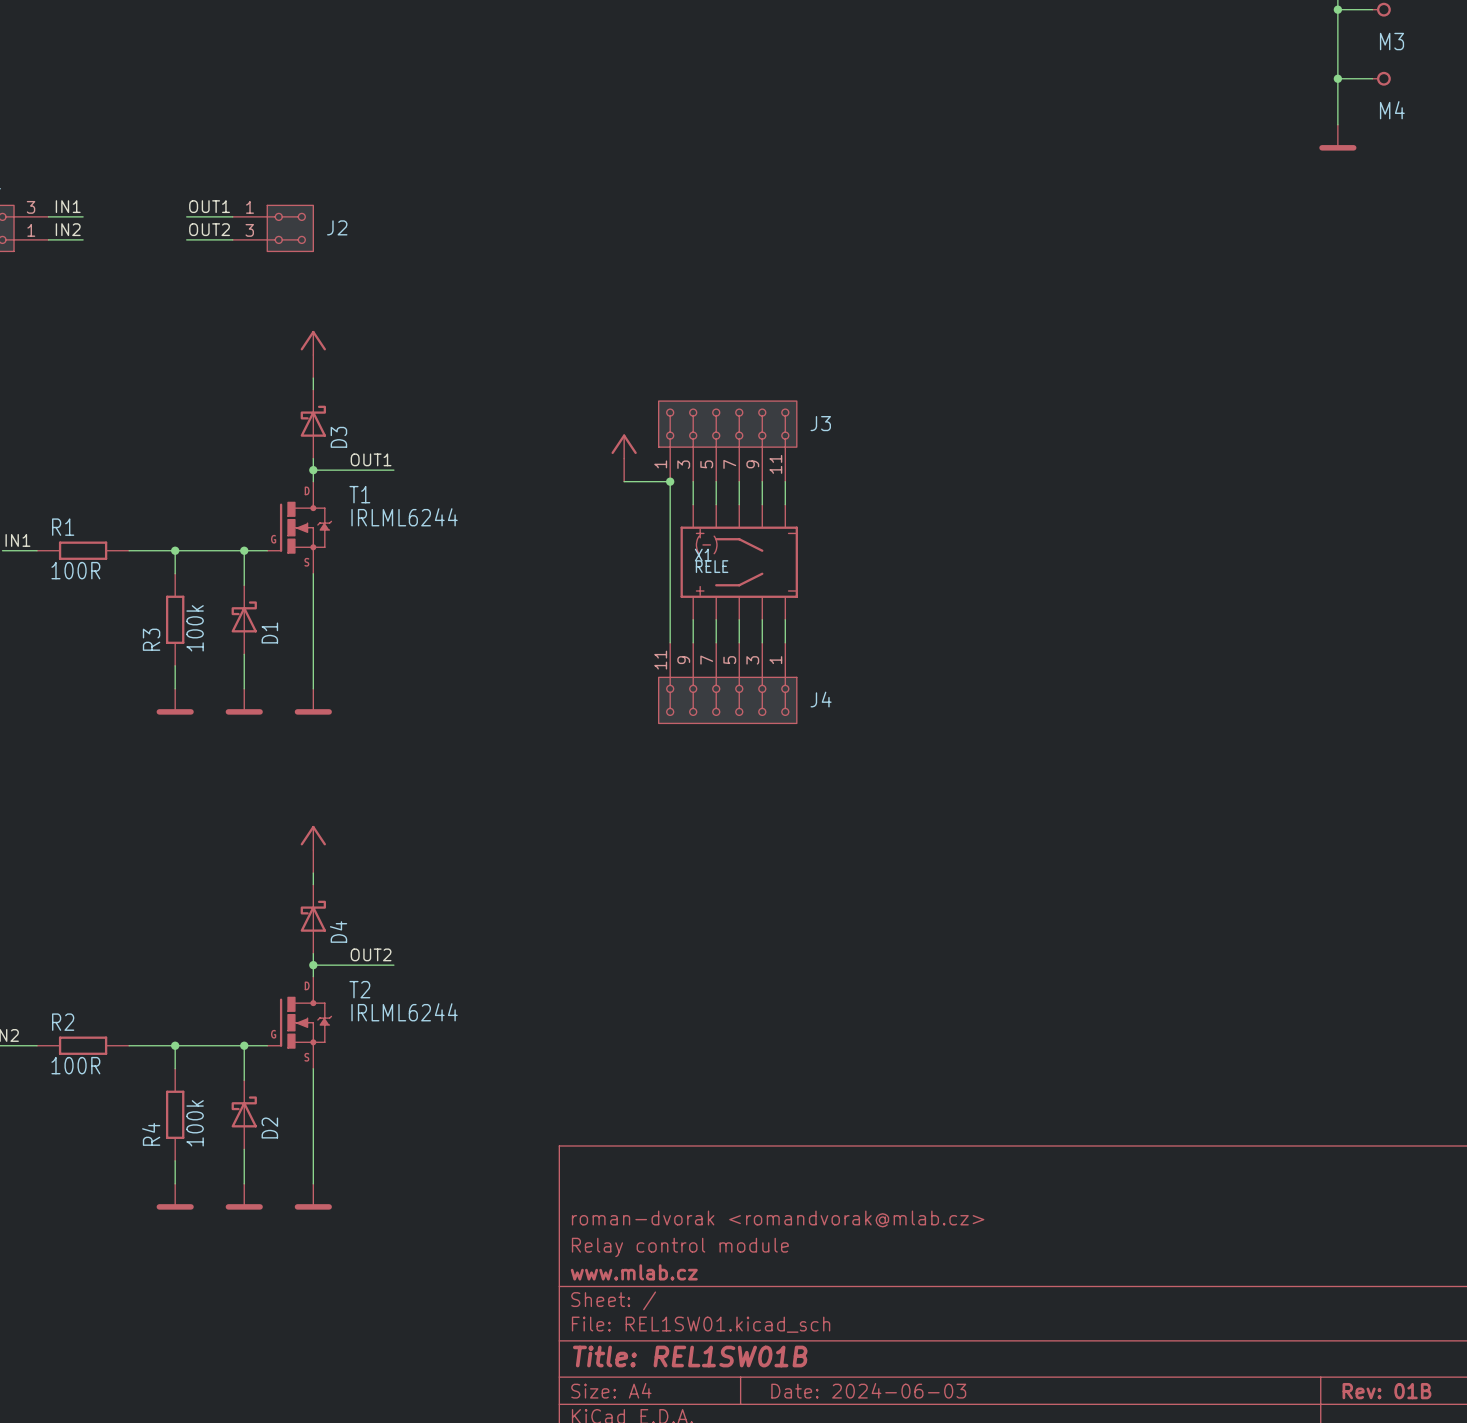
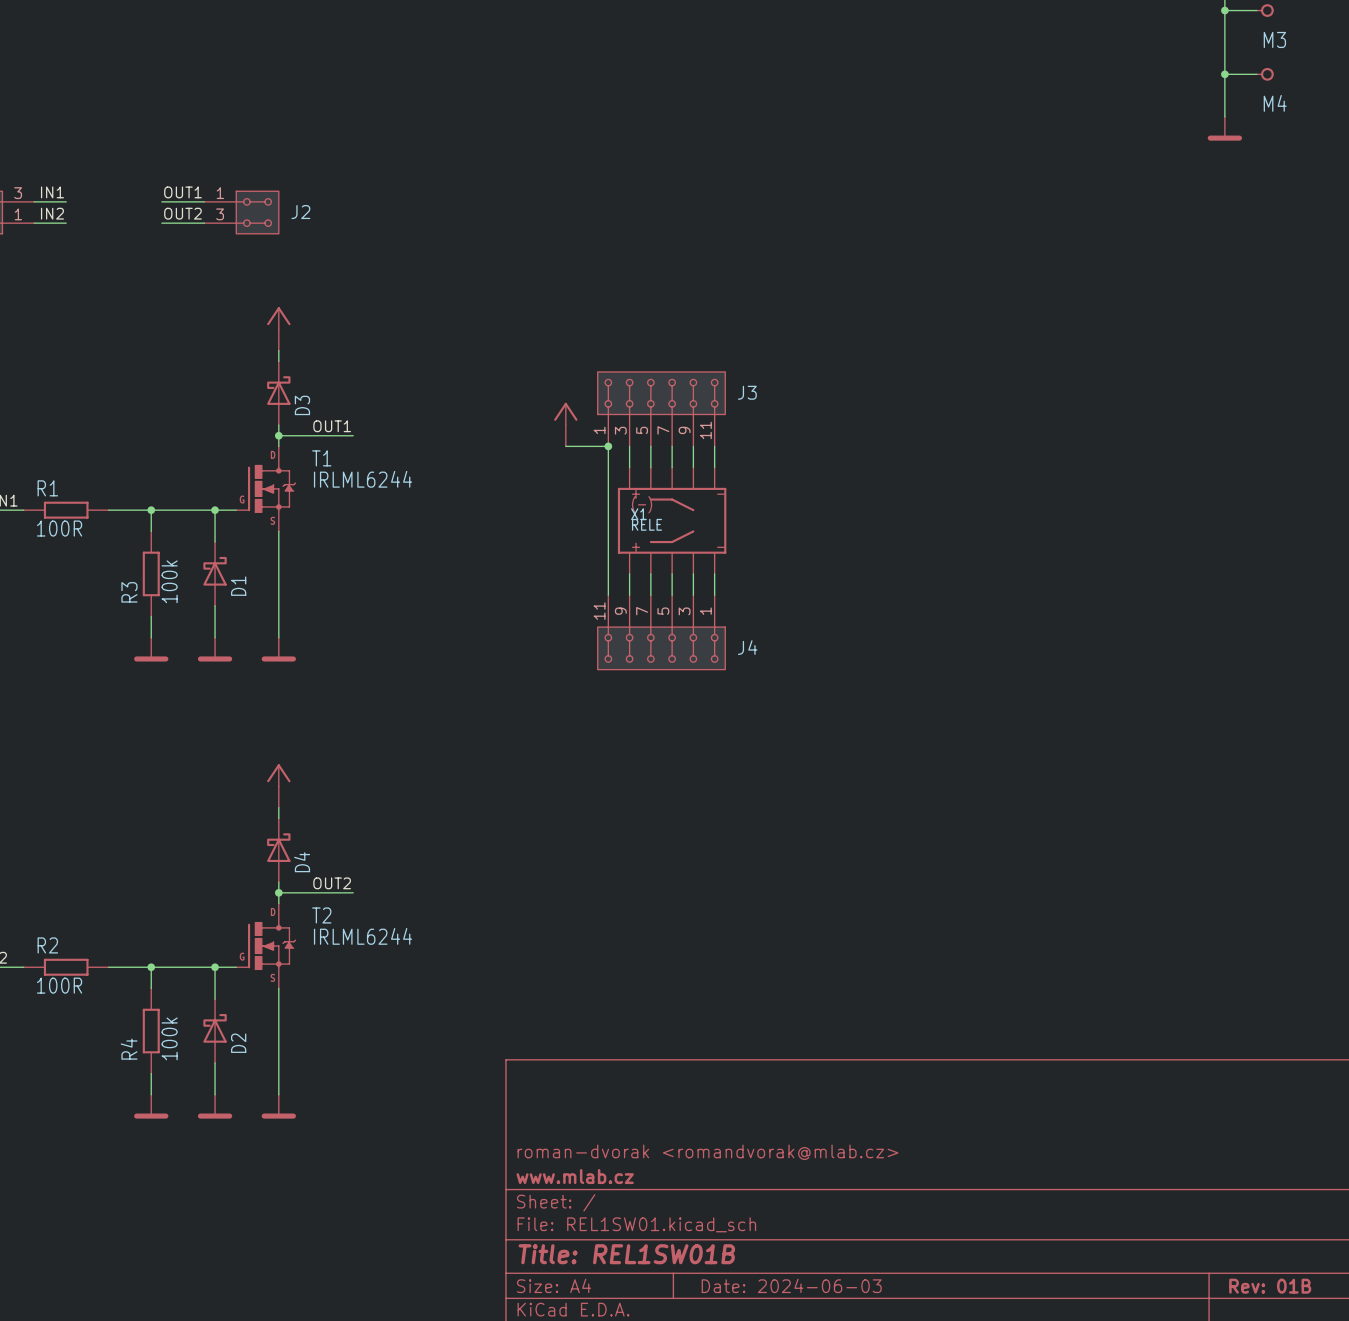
title block: roman-dvorak <romandvorak@mlab.cz> (778, 1218) -> none
title block: Relay control module (680, 1247) -> roman-dvorak <romandvorak@mlab.cz> (708, 1152)

